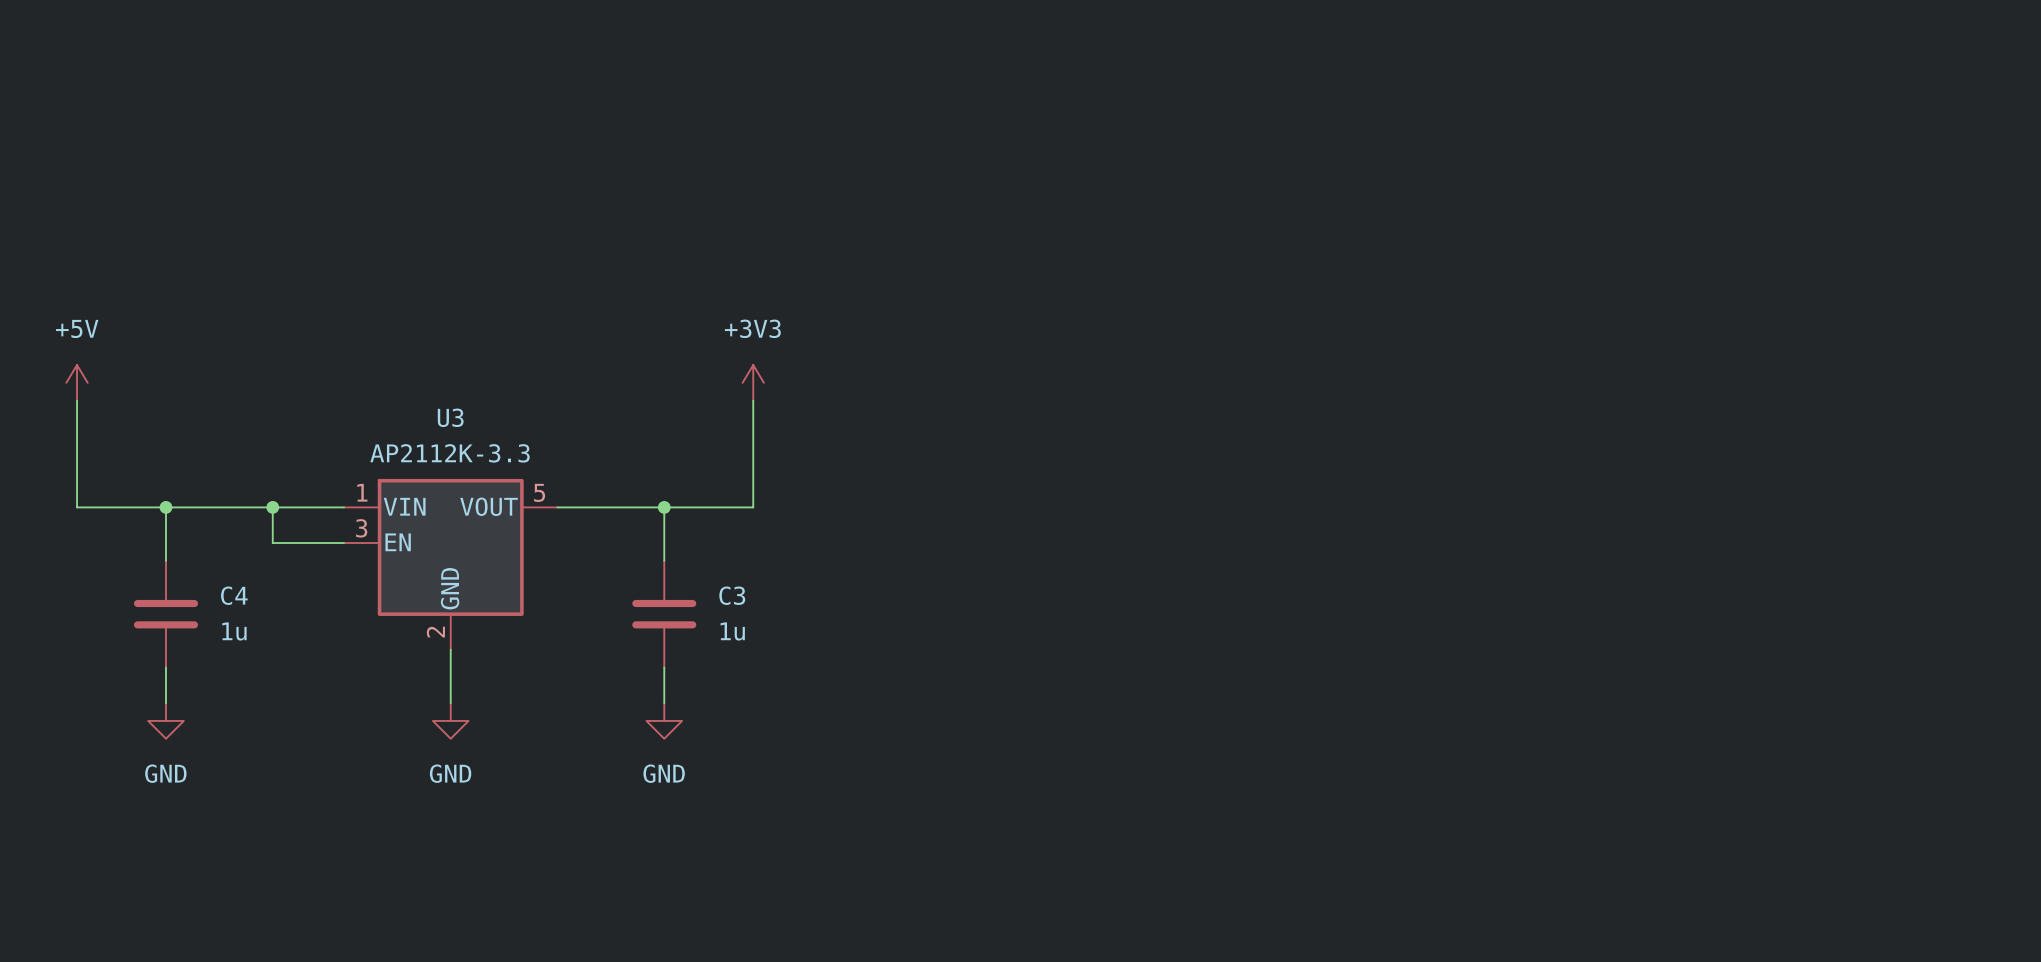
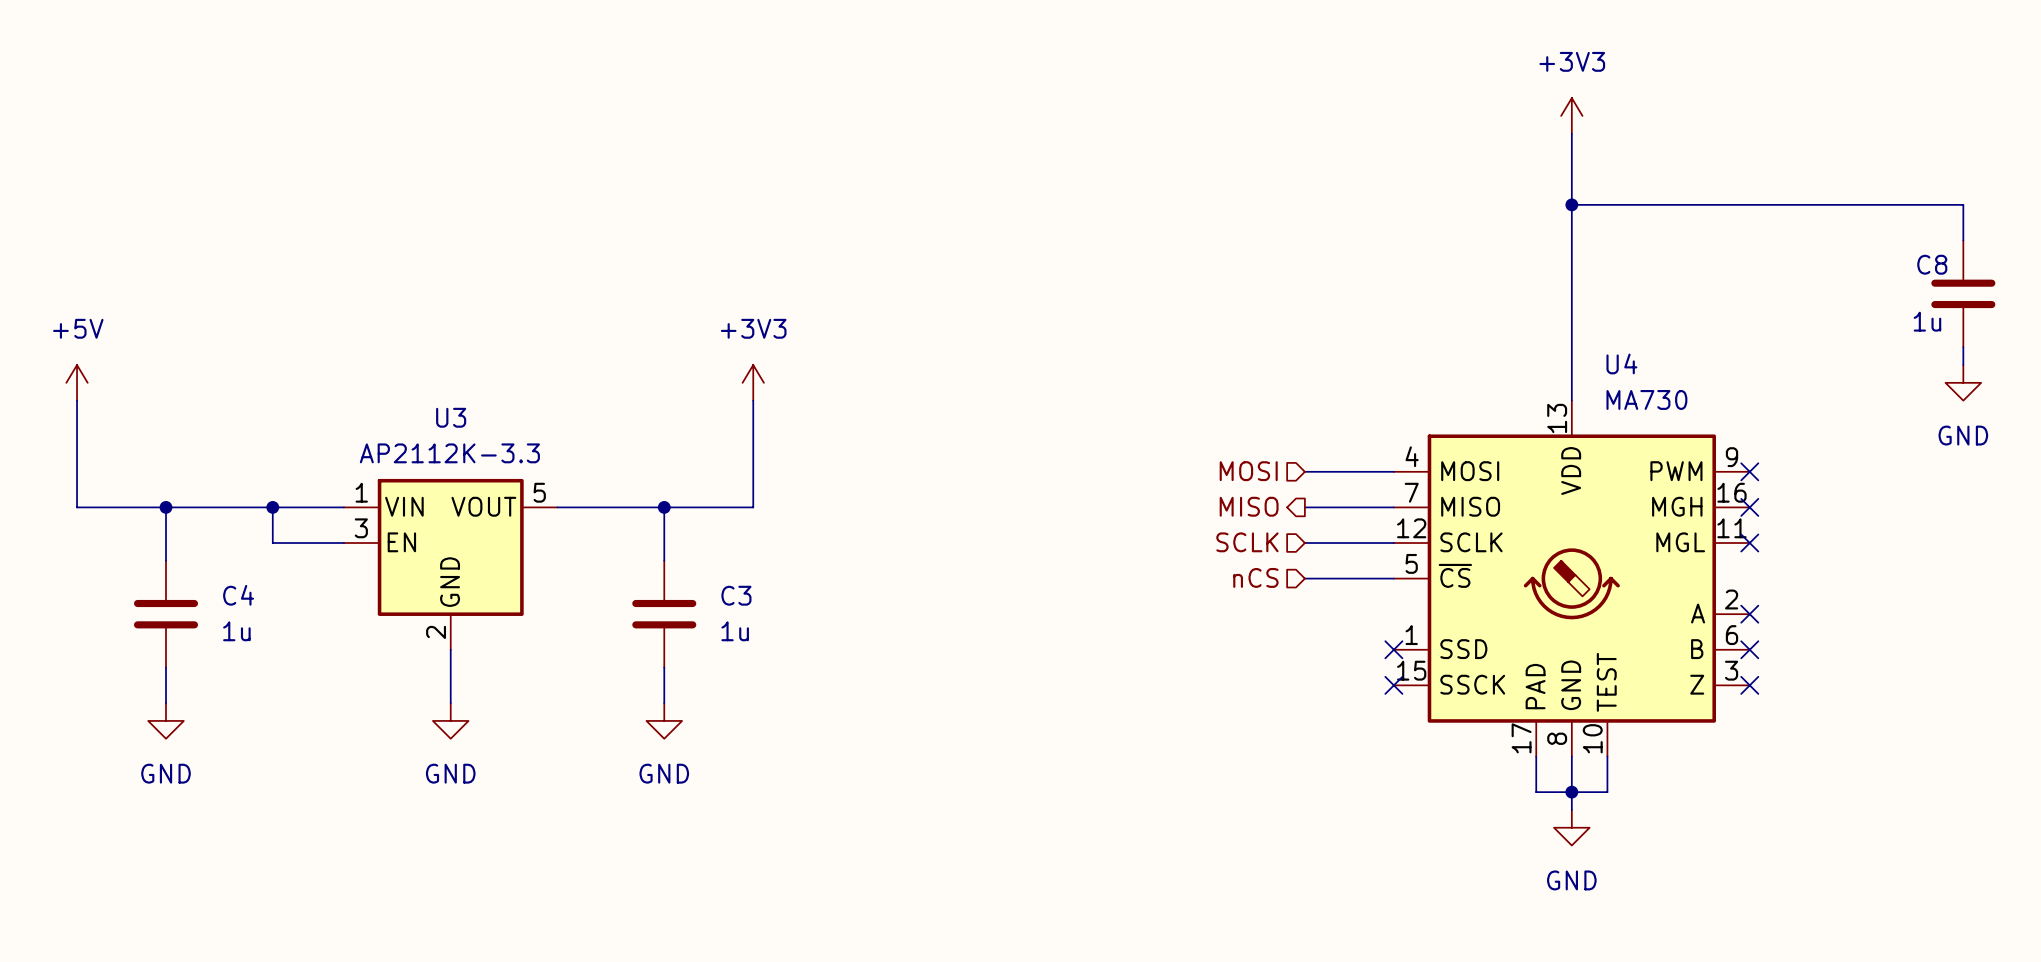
power symbol: none -> +3V3 (1571, 115)
wire: none -> (1571, 133) (1571, 400)
wire: none -> (1571, 204) (1963, 204) (1963, 240)
junction: none -> (1571, 204)
C8: none -> 1u (1963, 293)
wire: none -> (1963, 347) (1963, 365)
power symbol: none -> GND (1963, 382)
hierarchical label: none -> MOSI (1248, 471)
wire: none -> (1304, 471) (1393, 471)
no-connect mark: none -> (1749, 471)
hierarchical label: none -> MISO (1249, 506)
wire: none -> (1304, 507) (1393, 507)
no-connect mark: none -> (1749, 507)
hierarchical label: none -> SCLK (1247, 542)
wire: none -> (1304, 543) (1393, 543)
no-connect mark: none -> (1749, 543)
hierarchical label: none -> nCS (1255, 577)
wire: none -> (1304, 578) (1393, 578)
U4: none -> MA730 (1571, 578)
no-connect mark: none -> (1749, 614)
no-connect mark: none -> (1393, 649)
no-connect mark: none -> (1749, 649)
no-connect mark: none -> (1393, 685)
no-connect mark: none -> (1749, 685)
wire: none -> (1536, 756) (1536, 792) (1607, 792) (1607, 756)
wire: none -> (1571, 756) (1571, 809)
junction: none -> (1571, 792)
power symbol: none -> GND (1571, 827)

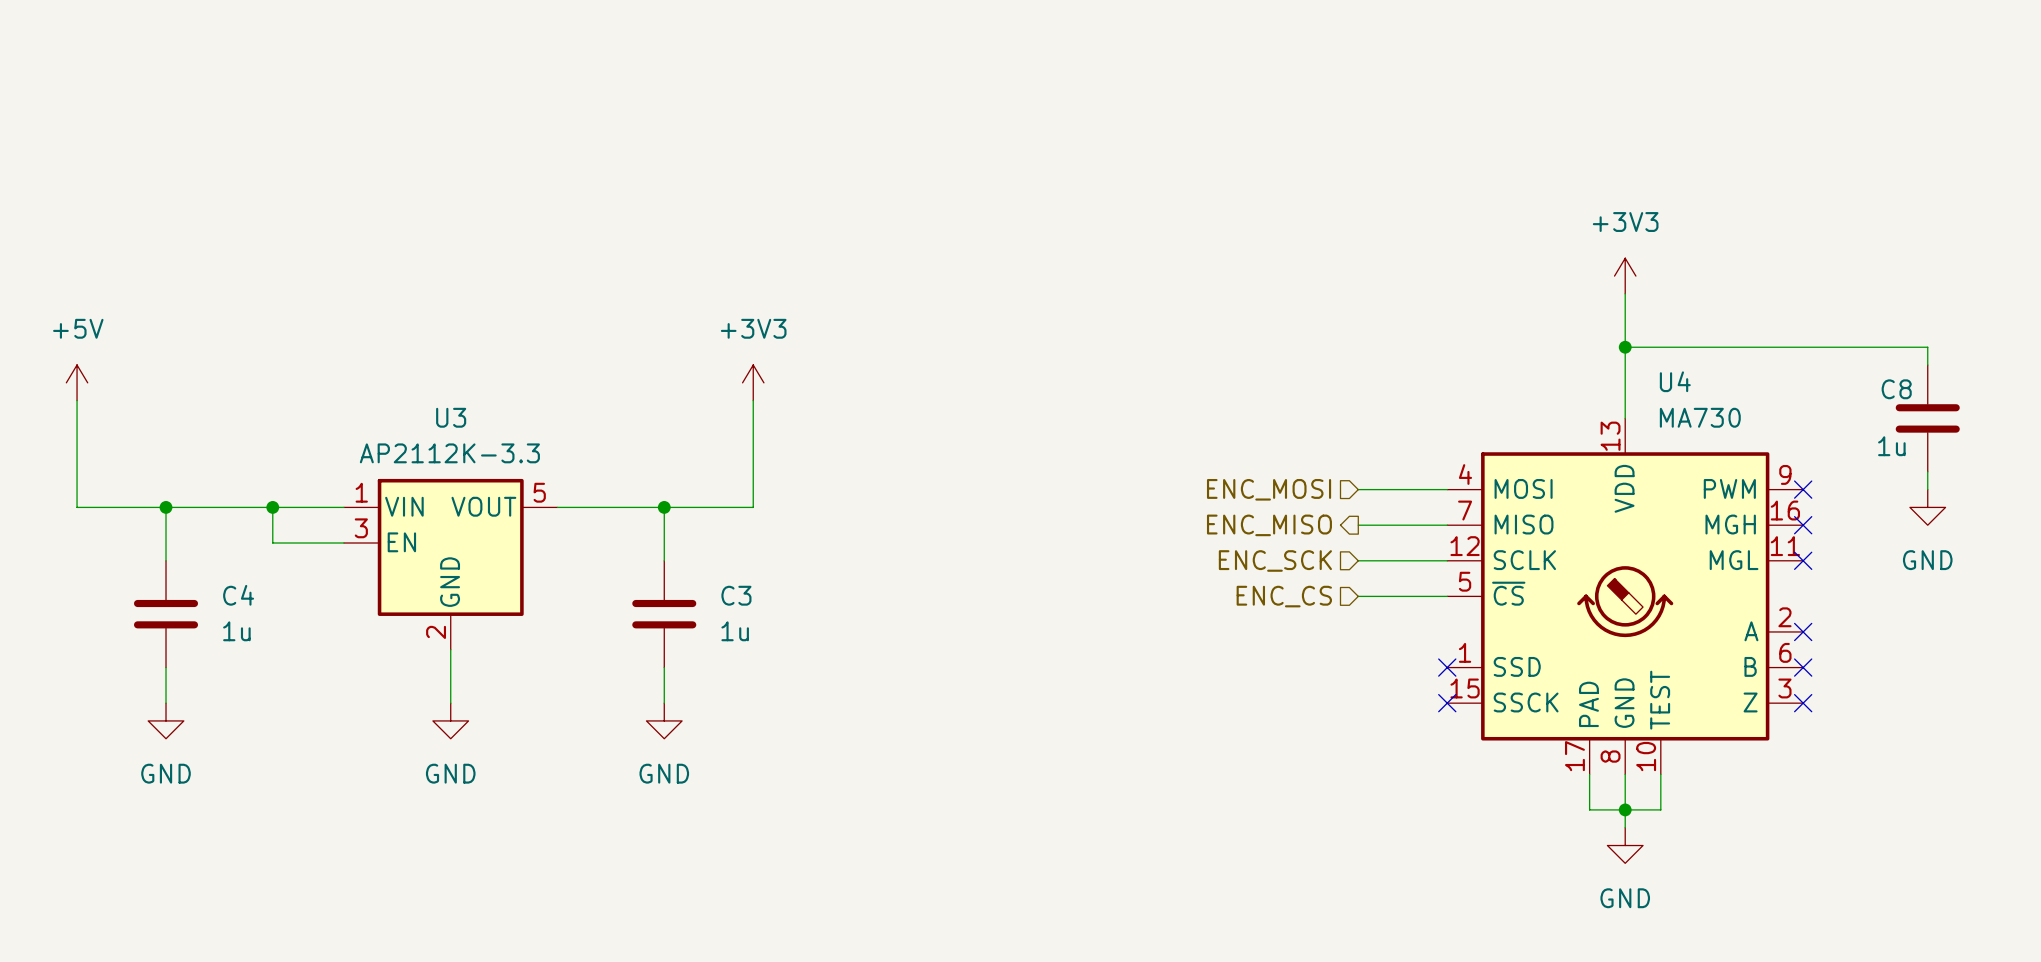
power symbol position: +3V3 (1571, 115) -> +3V3 (1625, 276)
wire: (1571, 133) (1571, 400) -> none
wire: (1571, 204) (1963, 204) (1963, 240) -> none
junction: (1571, 204) -> none
wire: none -> (1625, 293) (1625, 418)
C8 position: (1963, 293) -> (1927, 418)
wire: none -> (1625, 347) (1927, 347) (1927, 365)
junction: none -> (1625, 347)
wire: (1963, 347) (1963, 365) -> (1927, 471) (1927, 489)
power symbol position: GND (1963, 382) -> GND (1927, 507)
hierarchical label: MOSI (1248, 471) -> ENC_MOSI (1269, 489)
wire: (1304, 471) (1393, 471) -> (1358, 489) (1447, 489)
no-connect mark: (1749, 471) -> none
no-connect mark: none -> (1803, 489)
hierarchical label: MISO (1249, 506) -> ENC_MISO (1269, 525)
wire: (1304, 507) (1393, 507) -> (1358, 525) (1447, 525)
no-connect mark: (1749, 507) -> none
no-connect mark: none -> (1803, 525)
hierarchical label: SCLK (1247, 542) -> none
wire: (1304, 543) (1393, 543) -> (1358, 560) (1447, 560)
no-connect mark: (1749, 543) -> none
hierarchical label: none -> ENC_SCK (1275, 560)
no-connect mark: none -> (1803, 560)
hierarchical label: nCS (1255, 577) -> none
wire: (1304, 578) (1393, 578) -> (1358, 596) (1447, 596)
U4 position: (1571, 578) -> (1625, 596)
hierarchical label: none -> ENC_CS (1284, 596)
no-connect mark: (1749, 614) -> none
no-connect mark: none -> (1803, 631)
no-connect mark: (1393, 649) -> none
no-connect mark: (1749, 649) -> none
no-connect mark: none -> (1447, 667)
no-connect mark: none -> (1803, 667)
no-connect mark: (1393, 685) -> none
no-connect mark: (1749, 685) -> none
no-connect mark: none -> (1447, 703)
no-connect mark: none -> (1803, 703)
wire: (1536, 756) (1536, 792) (1607, 792) (1607, 756) -> (1589, 774) (1589, 809) (1660, 809) (1660, 774)
wire: (1571, 756) (1571, 809) -> (1625, 774) (1625, 827)
junction position: (1571, 792) -> (1625, 809)
power symbol position: GND (1571, 827) -> GND (1625, 845)

